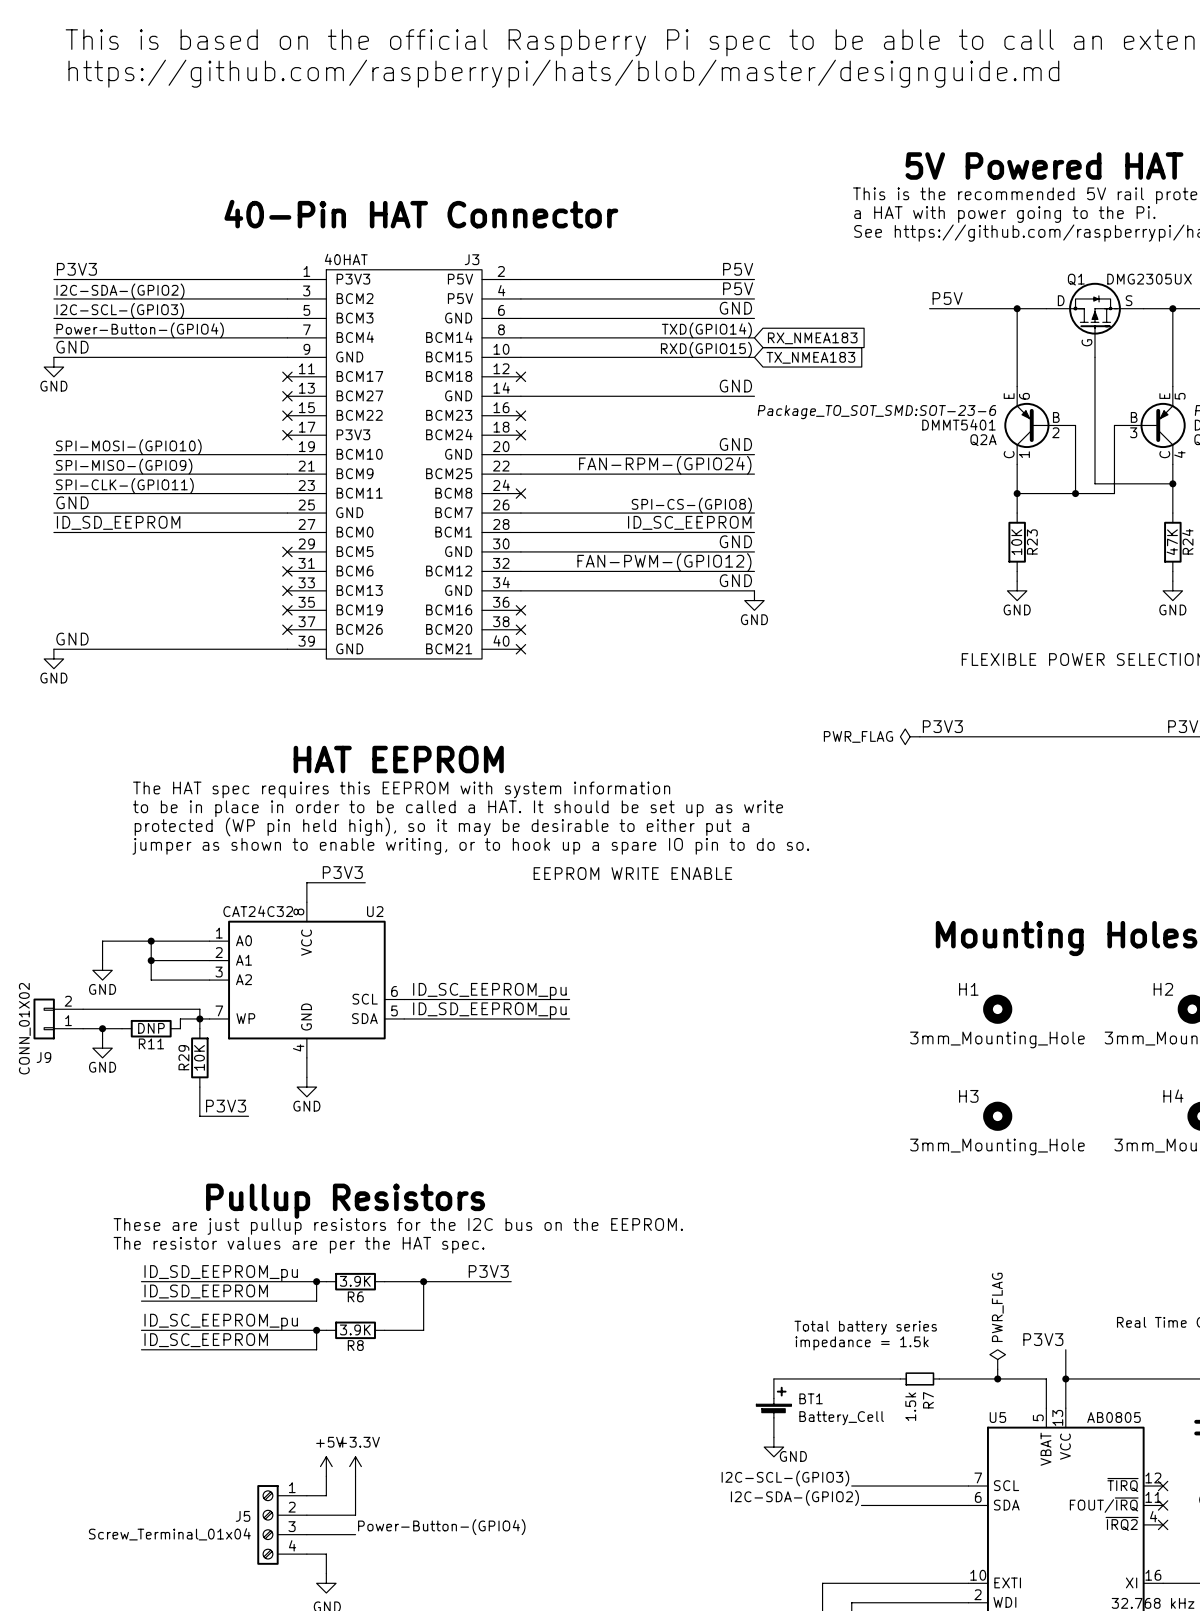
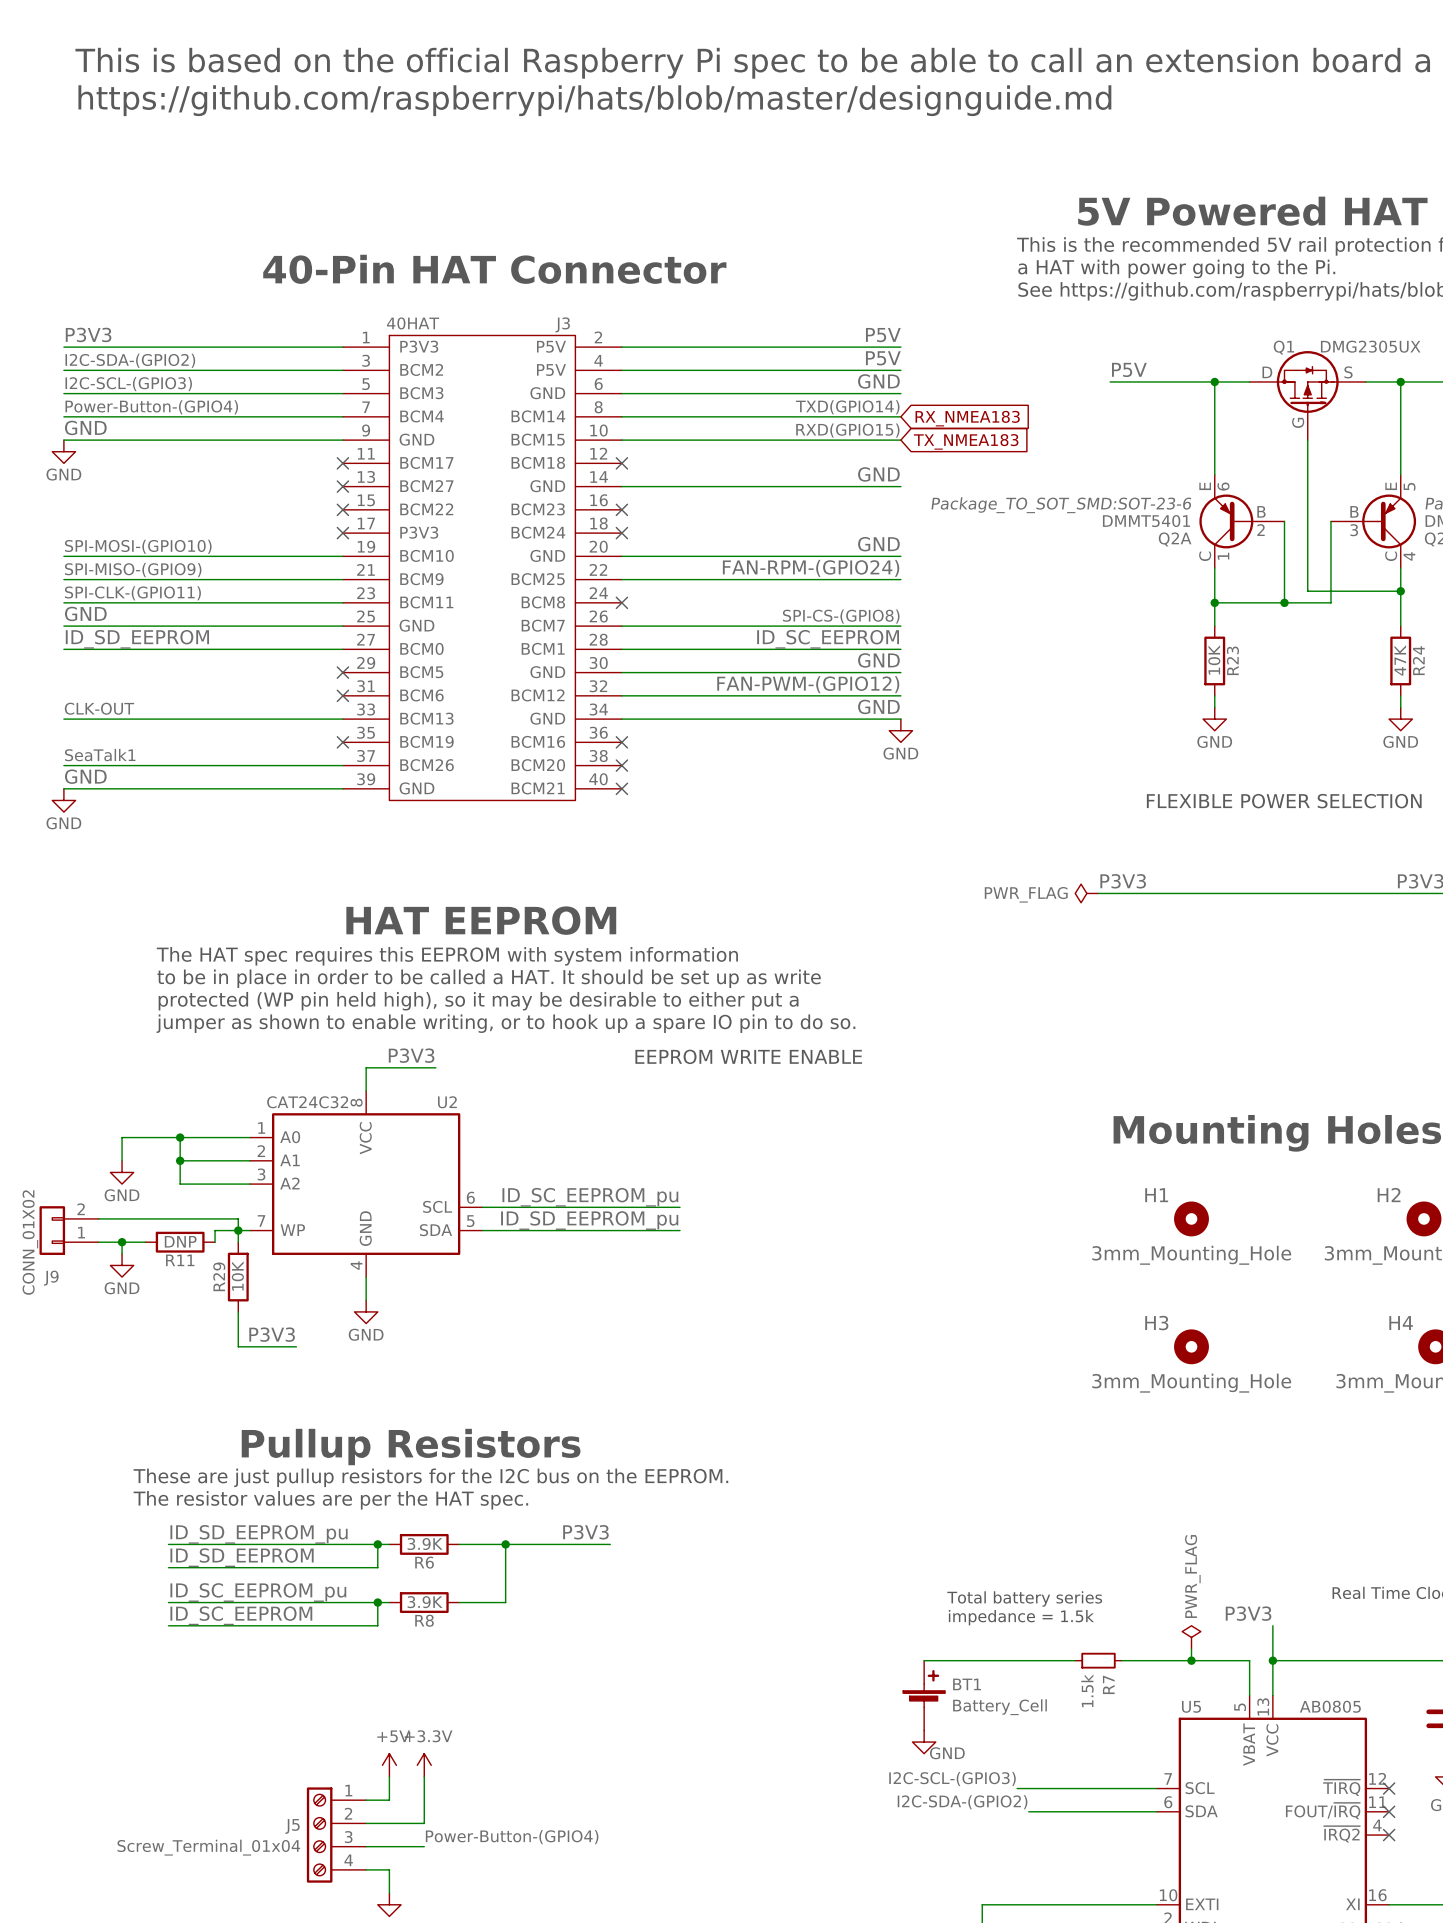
label: none -> CLK-OUT (99, 708)
wire: none -> (63, 719) (342, 719)
no-connect mark: (287, 590) -> none
label: none -> SeaTalk1 (100, 755)
wire: none -> (63, 765) (342, 765)
no-connect mark: (287, 629) -> none

